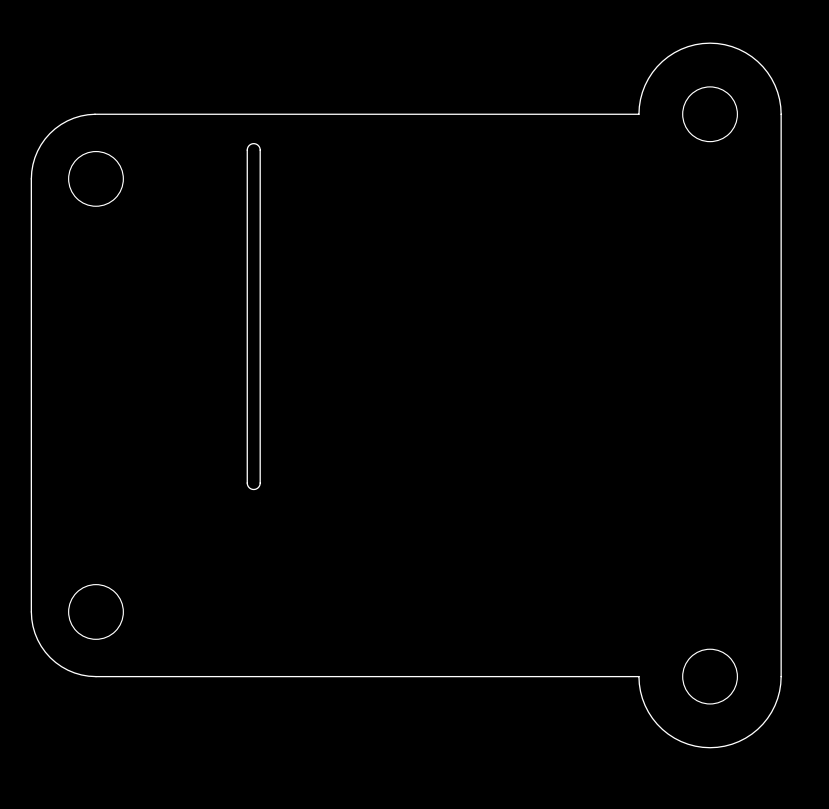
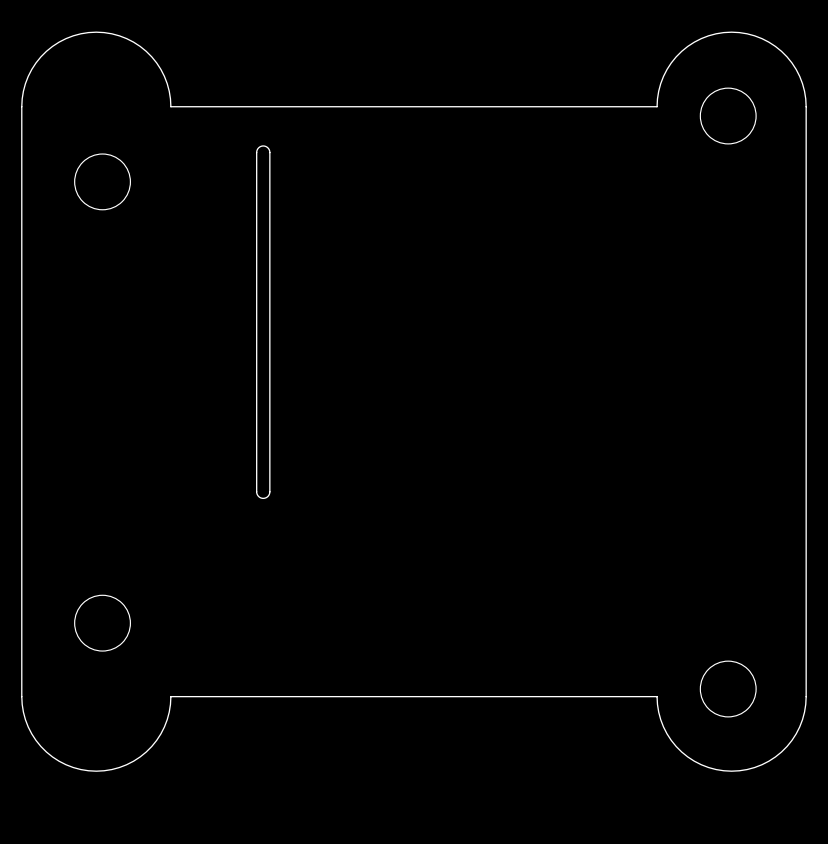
board edge: (781, 114) (781, 676) (777, 698) (771, 712) (762, 724) (751, 734) (738, 741) (717, 747) (695, 746) (681, 741) (668, 734) (652, 718) (642, 698) (638, 676) (95, 676) (81, 674) (67, 670) (55, 662) (45, 652) (34, 633) (31, 611) (31, 178) (32, 164) (37, 151) (45, 138) (55, 128) (73, 118) (94, 114) (638, 114) (642, 92) (648, 78) (657, 66) (668, 56) (681, 49) (695, 44) (710, 43) (732, 46) (745, 52) (757, 61) (767, 72) (775, 85) (779, 99) (781, 114) -> (806, 106) (806, 696) (804, 712) (799, 726) (791, 740) (781, 752) (761, 764) (739, 770) (723, 770) (701, 764) (687, 756) (671, 740) (660, 719) (657, 696) (170, 696) (167, 719) (156, 740) (140, 756) (126, 764) (104, 770) (80, 769) (59, 761) (40, 746) (31, 733) (25, 719) (21, 696) (21, 106) (23, 91) (28, 76) (36, 62) (46, 51) (59, 42) (80, 33) (104, 32) (126, 38) (140, 46) (156, 62) (167, 83) (170, 106) (657, 106) (658, 91) (663, 76) (671, 62) (681, 51) (694, 42) (708, 35) (723, 32) (739, 32) (754, 35) (768, 42) (787, 56) (796, 69) (802, 83) (806, 106)

